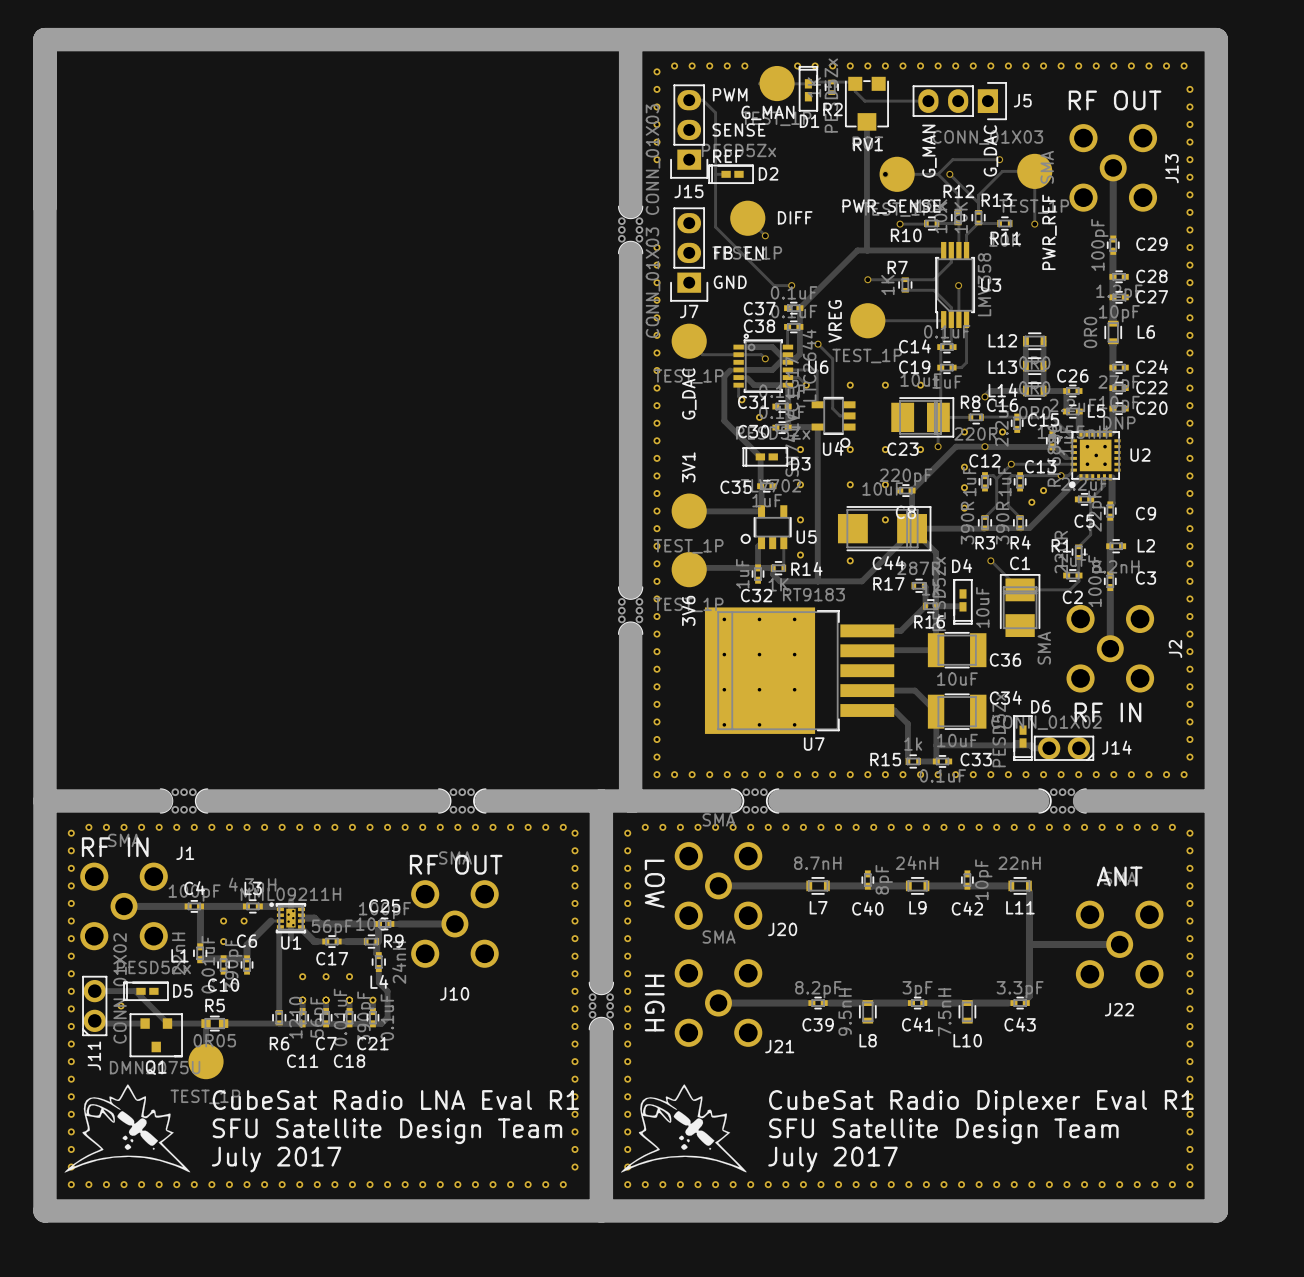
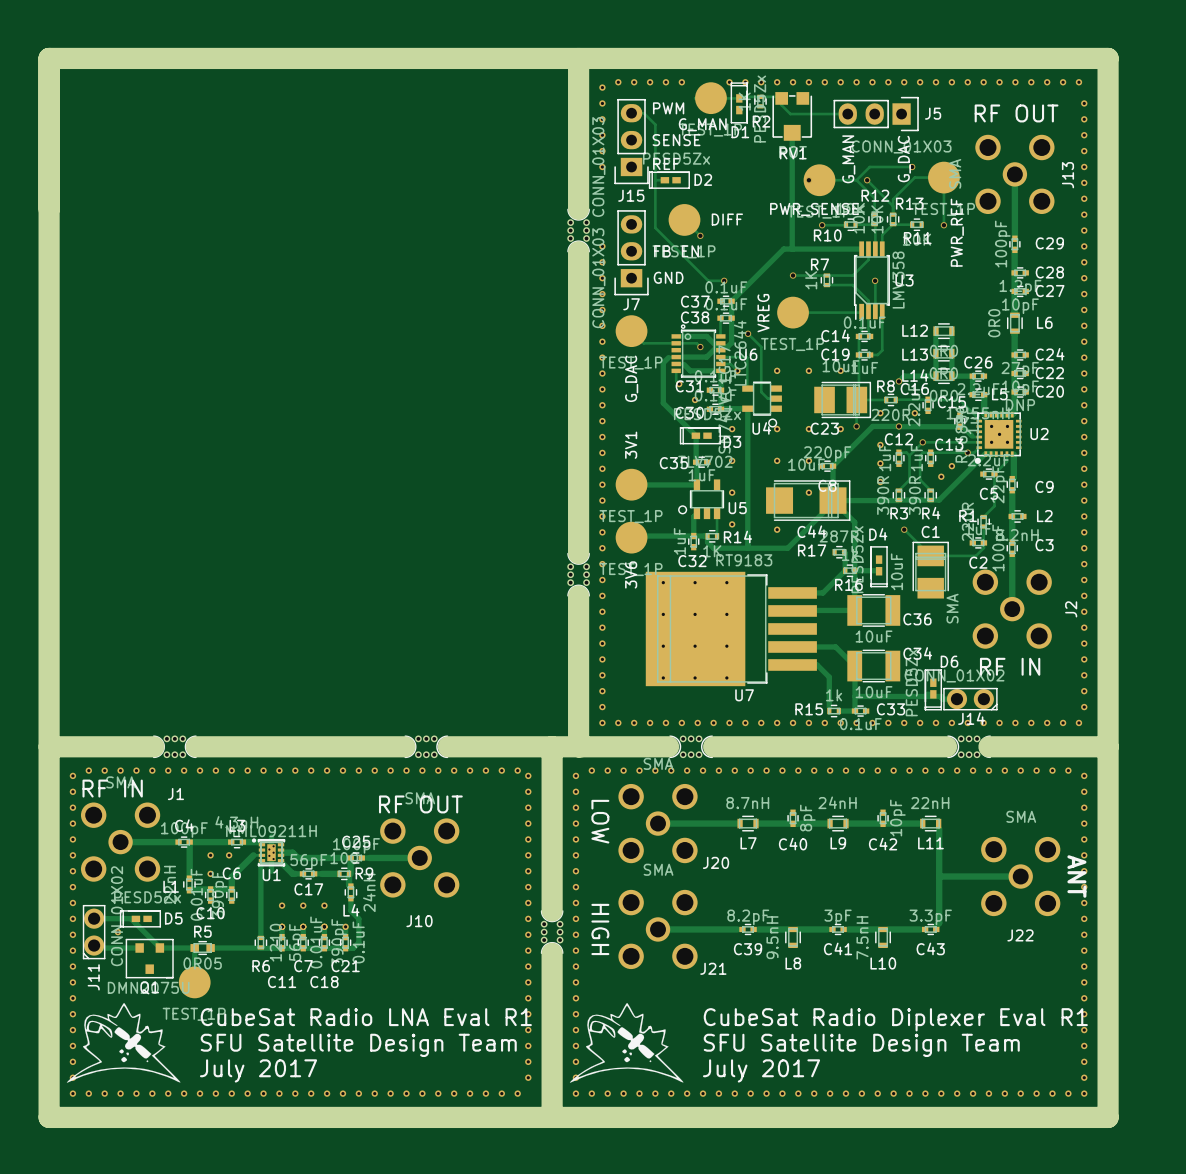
J14 name position: J14 (1116, 747) -> J14 (971, 718)
text rotation: 0° (1119, 876) -> 90° clockwise (1076, 876)
text position: ANT (1119, 876) -> ANT (1076, 876)

